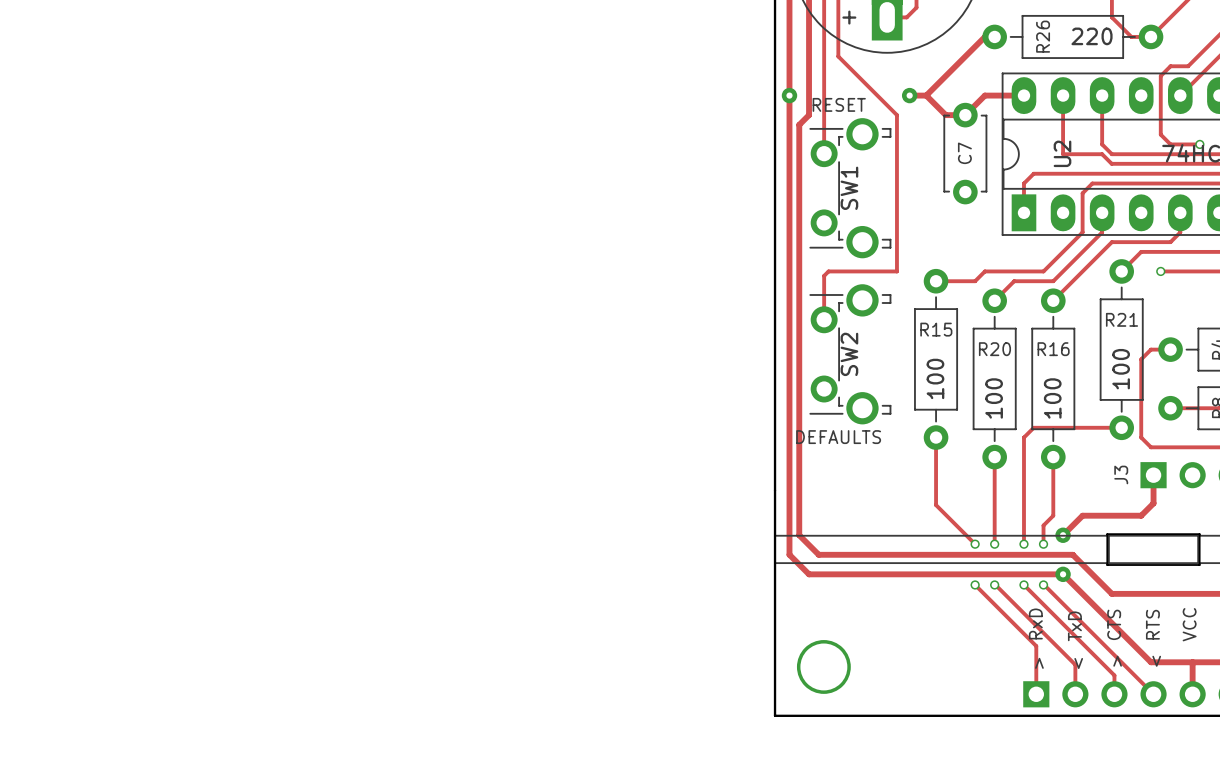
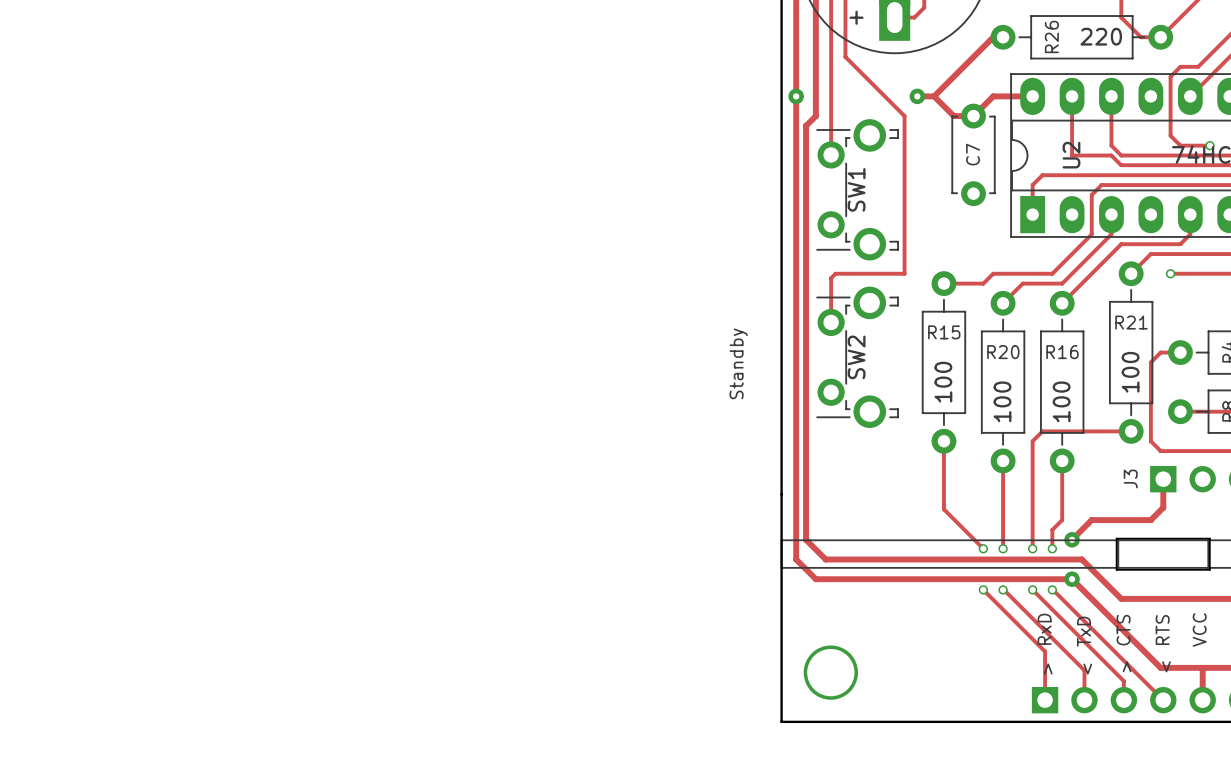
SW1 value: RESET (839, 104) -> none
text: none -> Standby (738, 363)
SW2 value: DEFAULTS (838, 437) -> none

